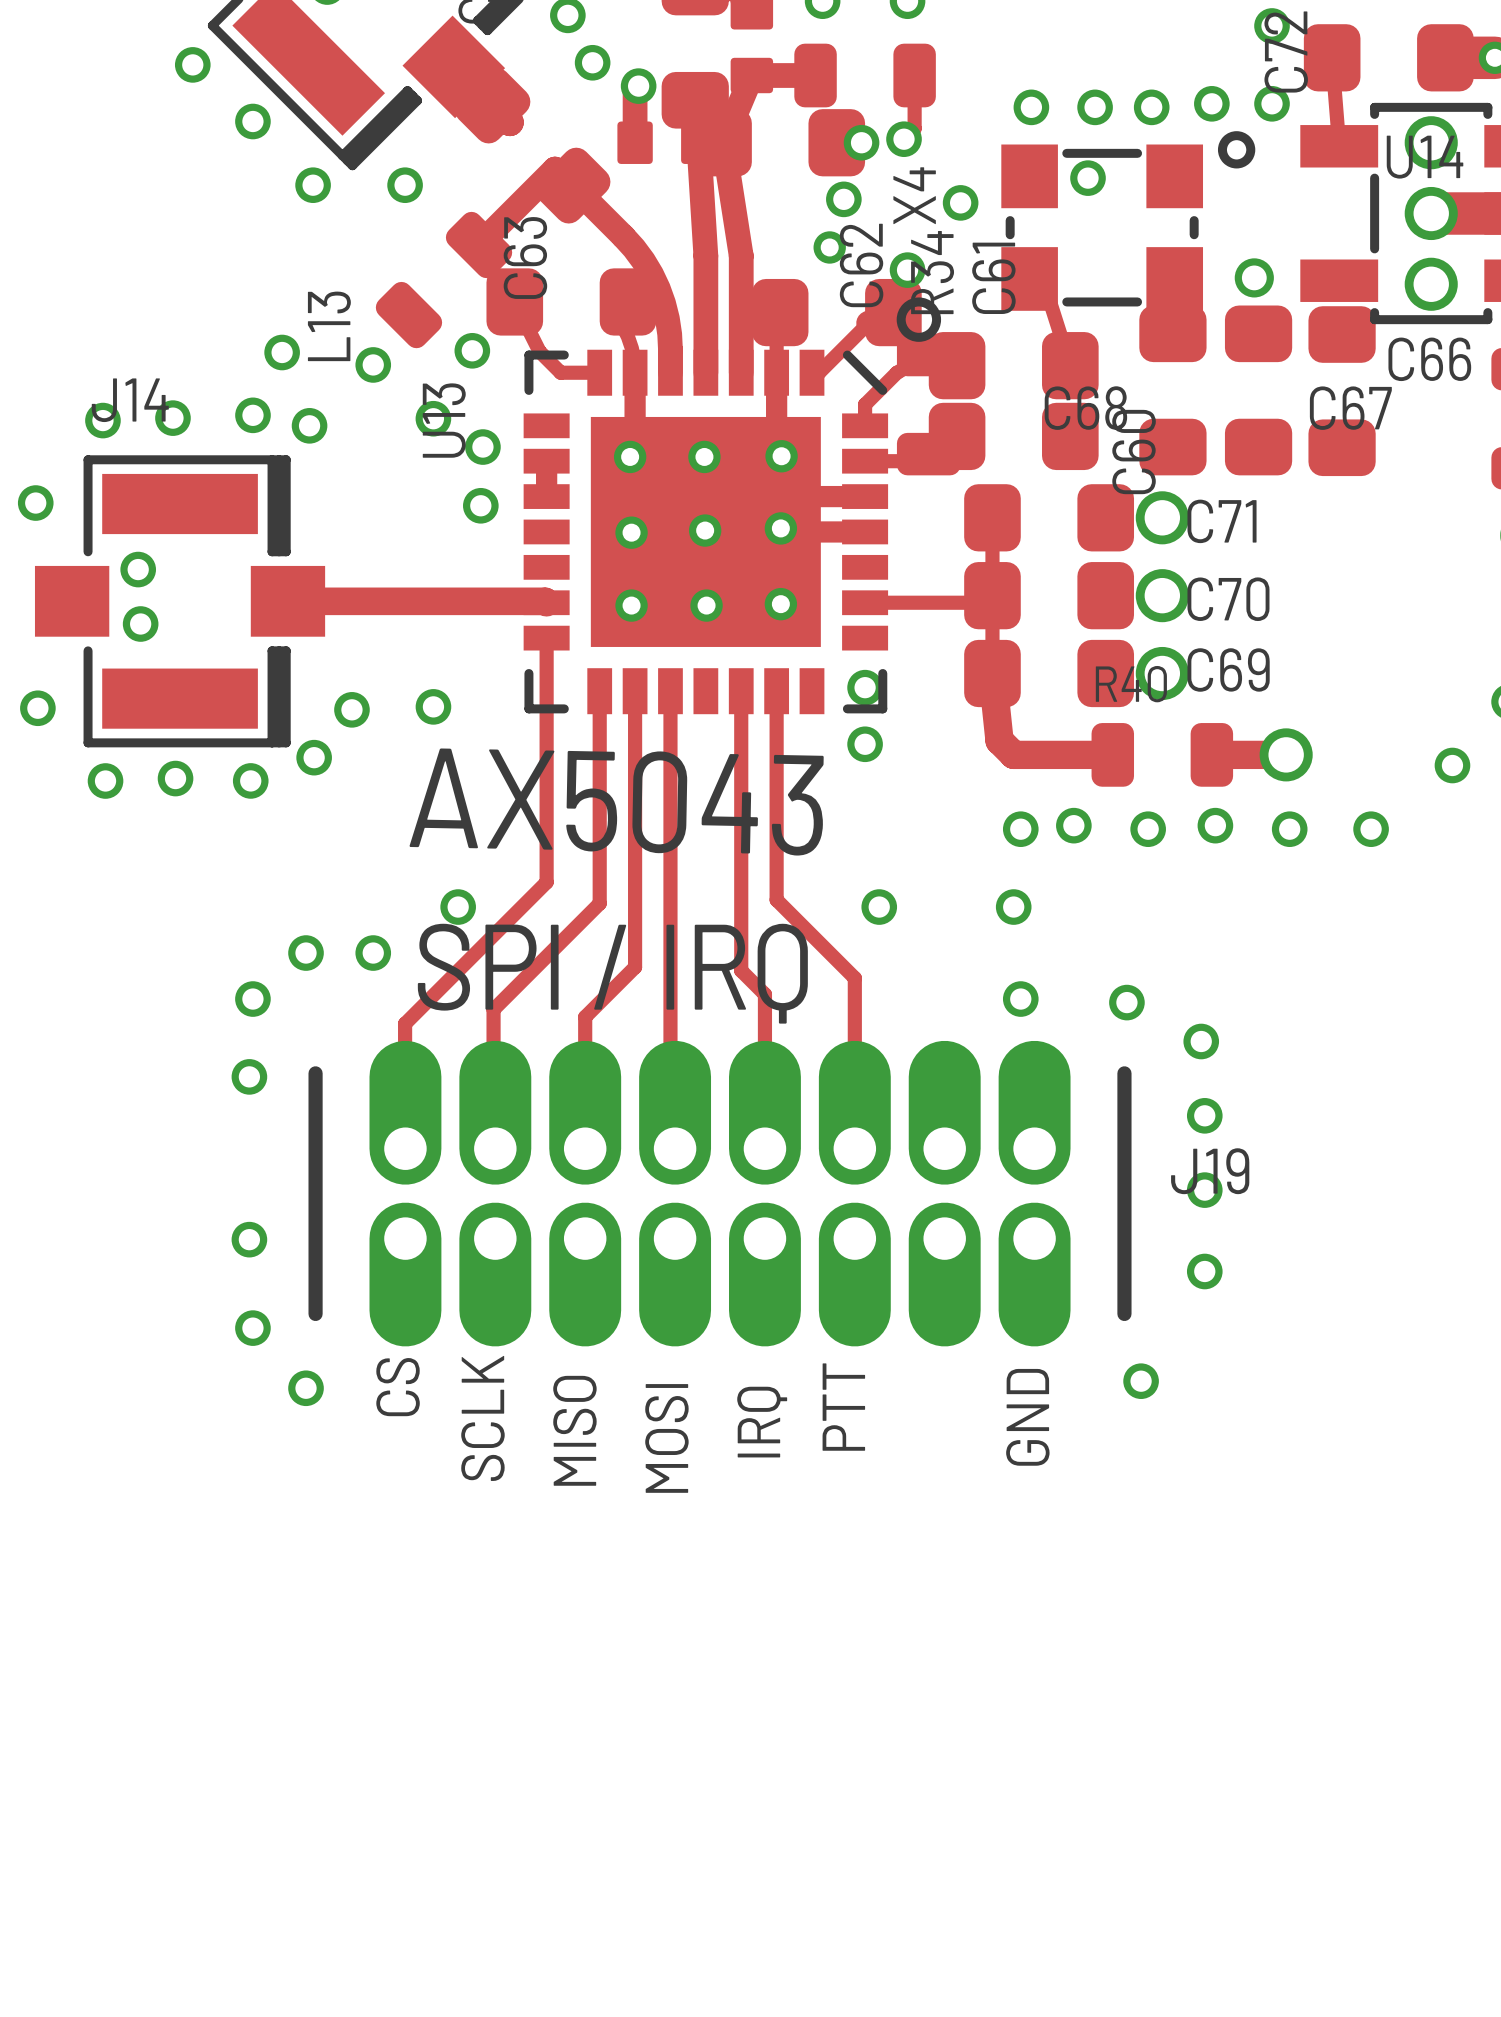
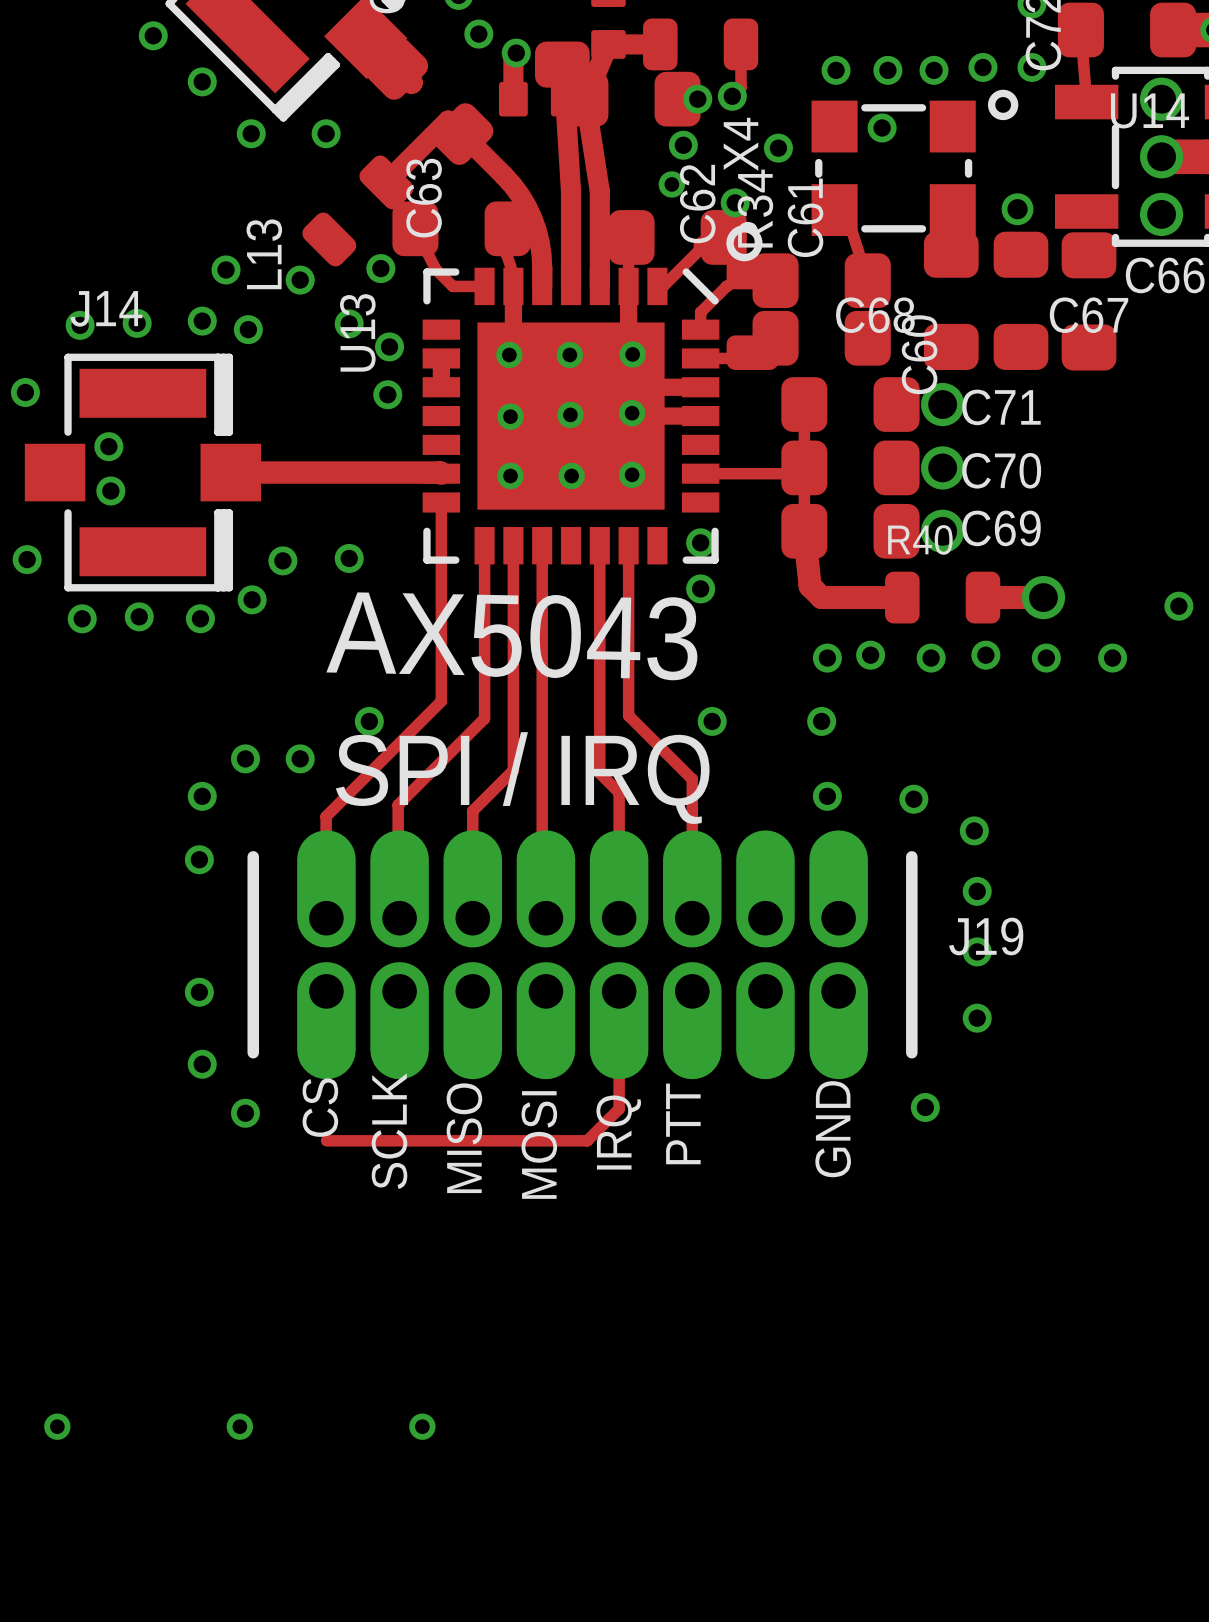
track: none -> (619, 991) (619, 1108) (587, 1140) (326, 1140)
via: none -> (57, 1426)
via: none -> (239, 1426)
via: none -> (422, 1426)

